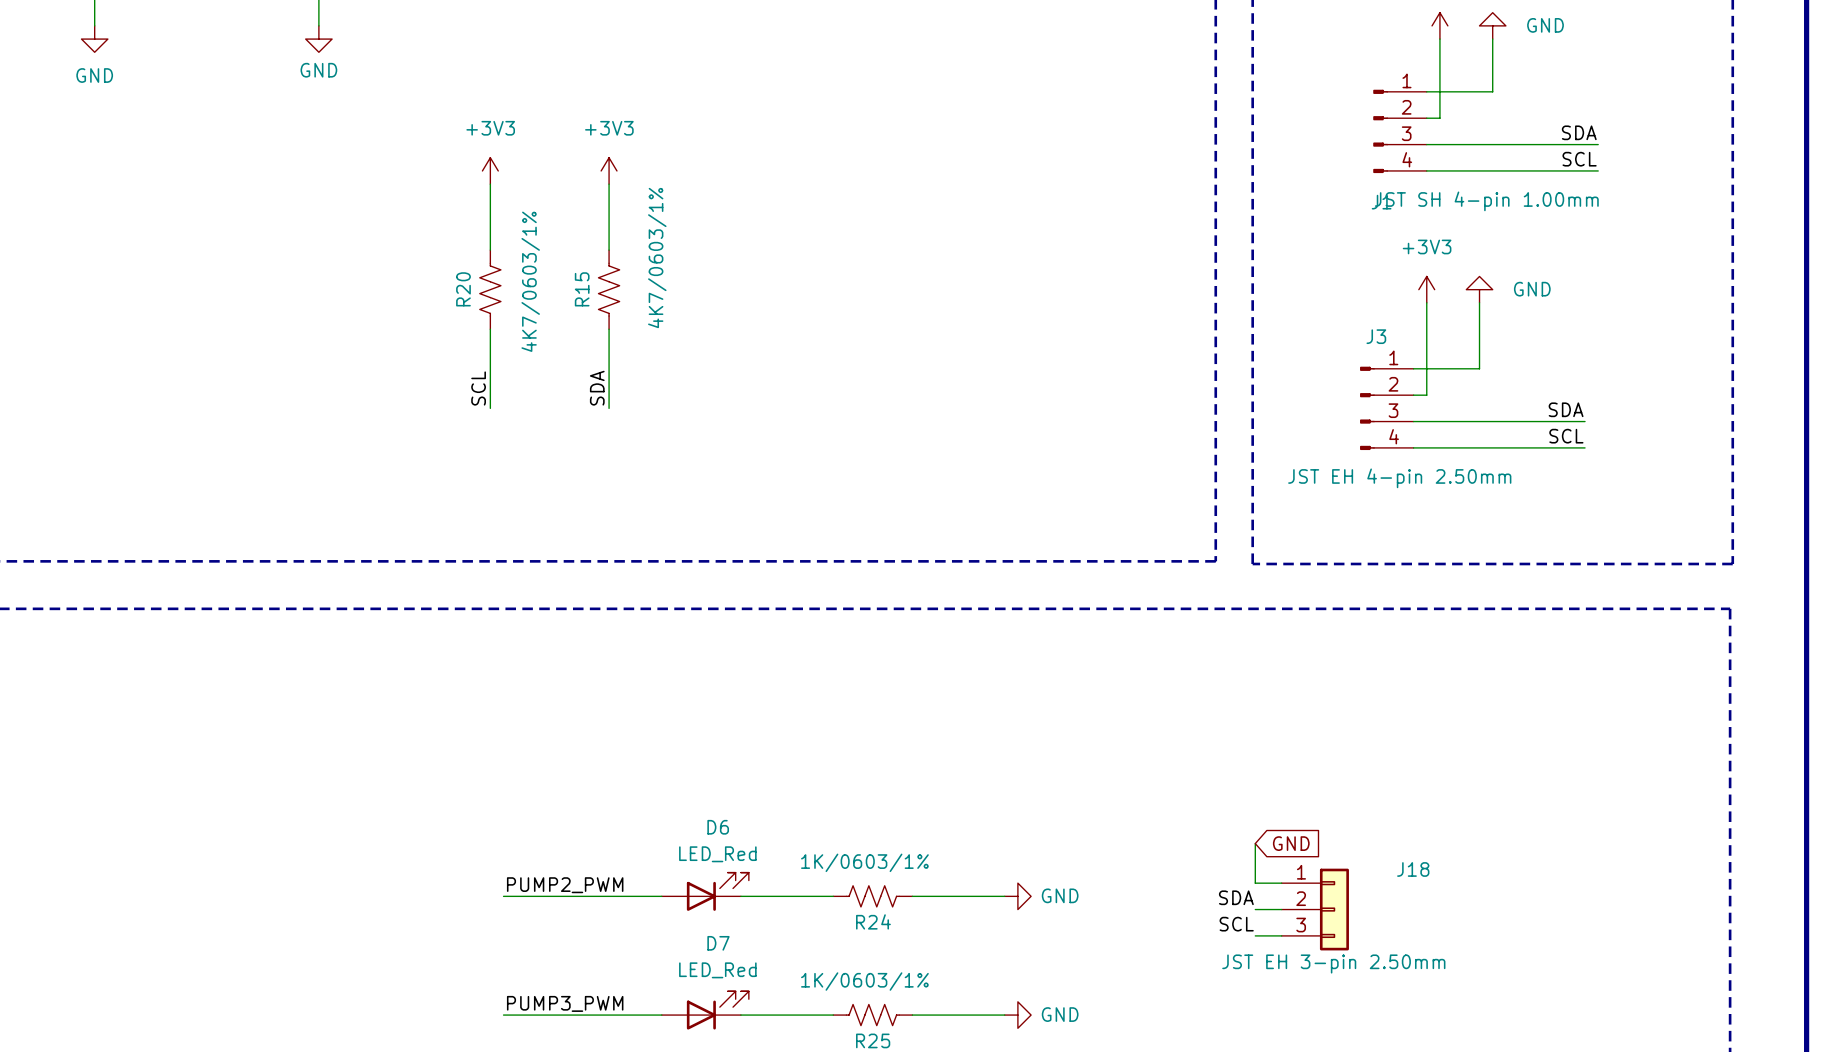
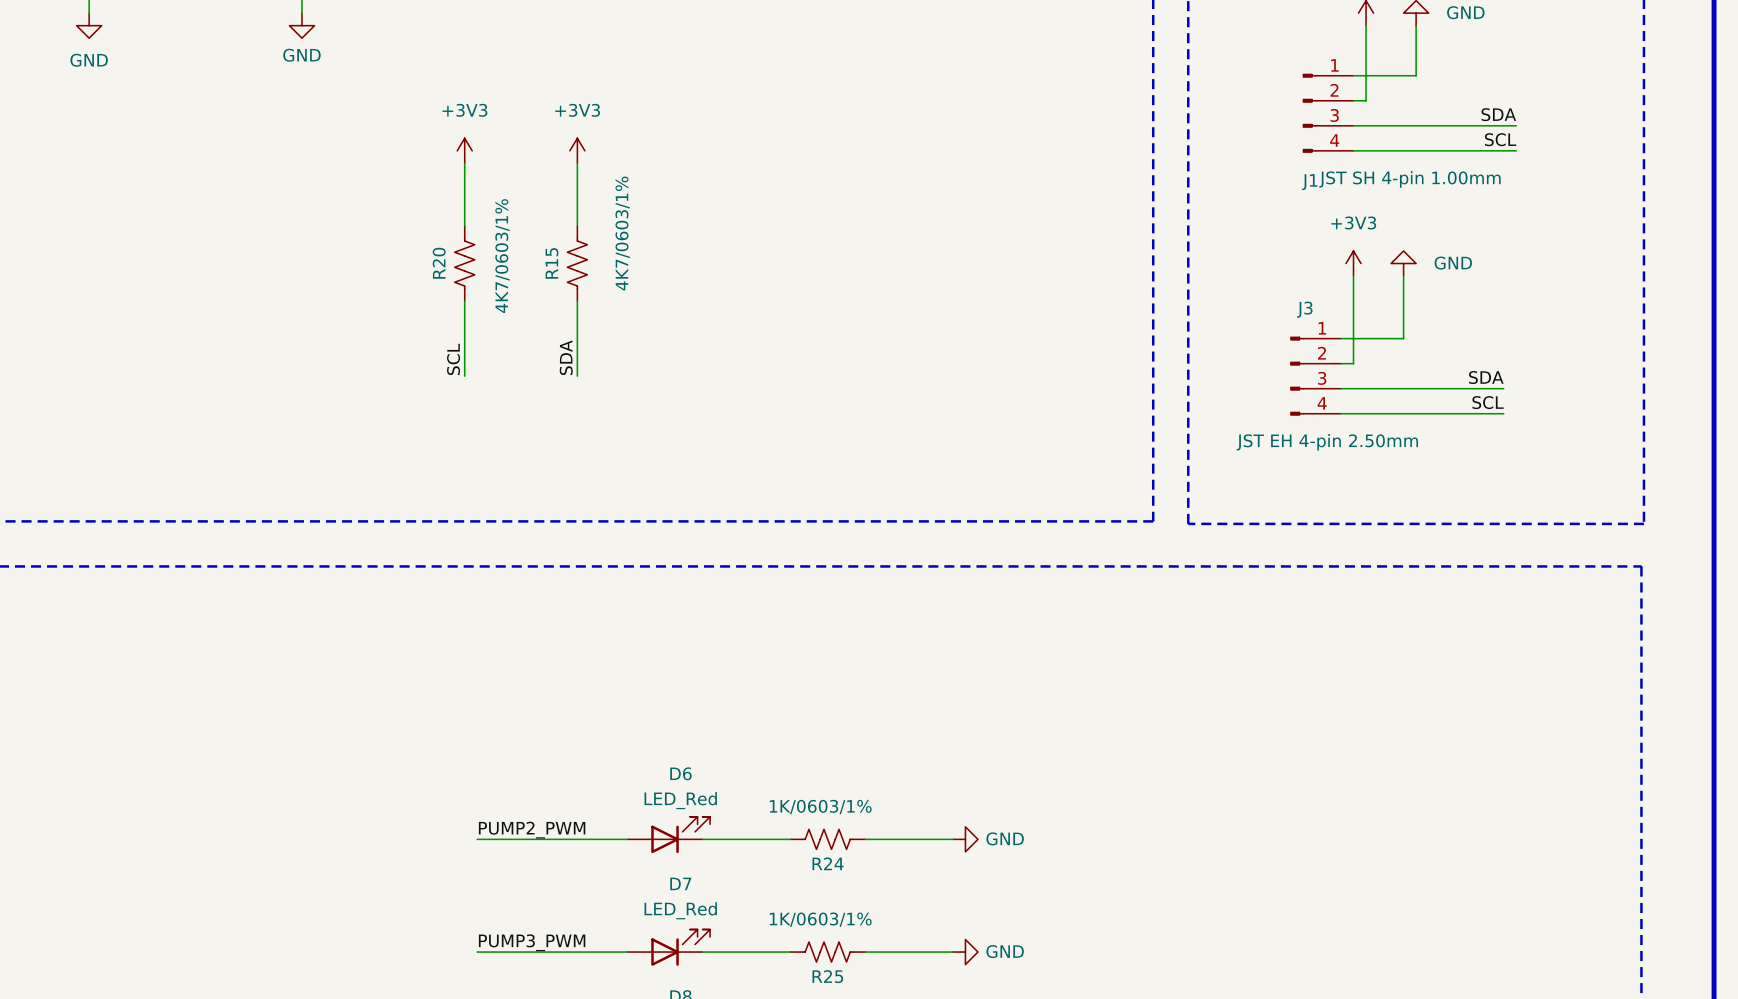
wire: (1255, 843) (1255, 883) (1281, 883) -> none
global label: GND (1291, 843) -> none
label: SDA (1236, 897) -> none
wire: (1255, 909) (1281, 909) -> none
J18: JST EH 3-pin 2.50mm (1315, 909) -> none
label: SCL (1236, 924) -> none
wire: (1255, 935) (1281, 935) -> none

